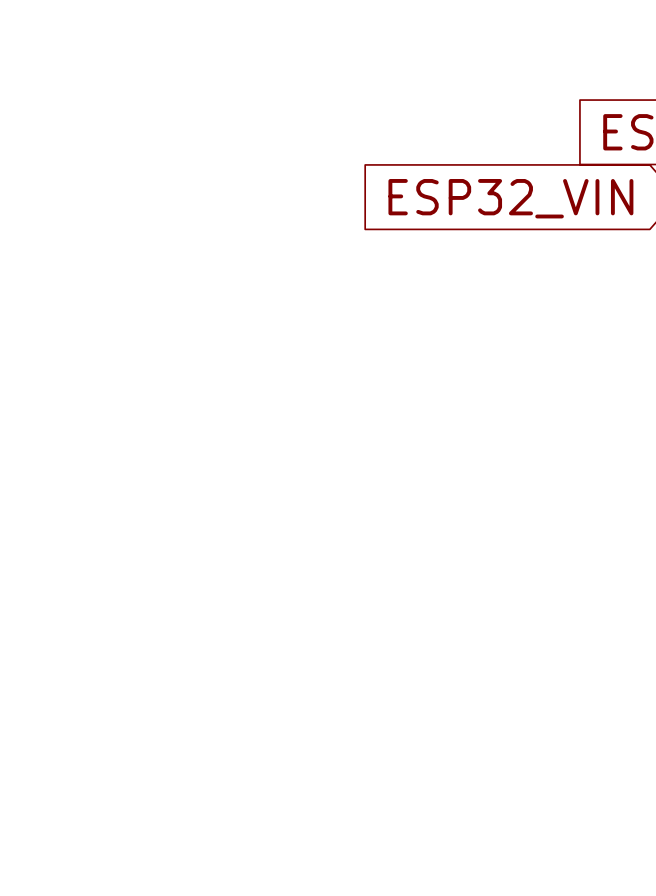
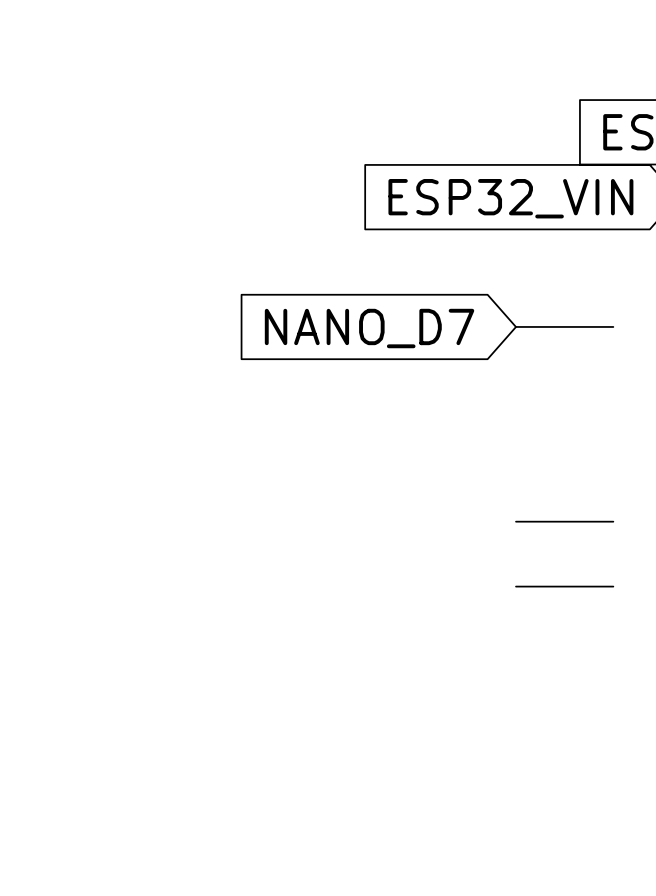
wire: none -> (515, 326) (613, 326)
global label: none -> NANO_D7 (369, 328)
wire: none -> (515, 521) (613, 521)
wire: none -> (515, 586) (613, 586)

